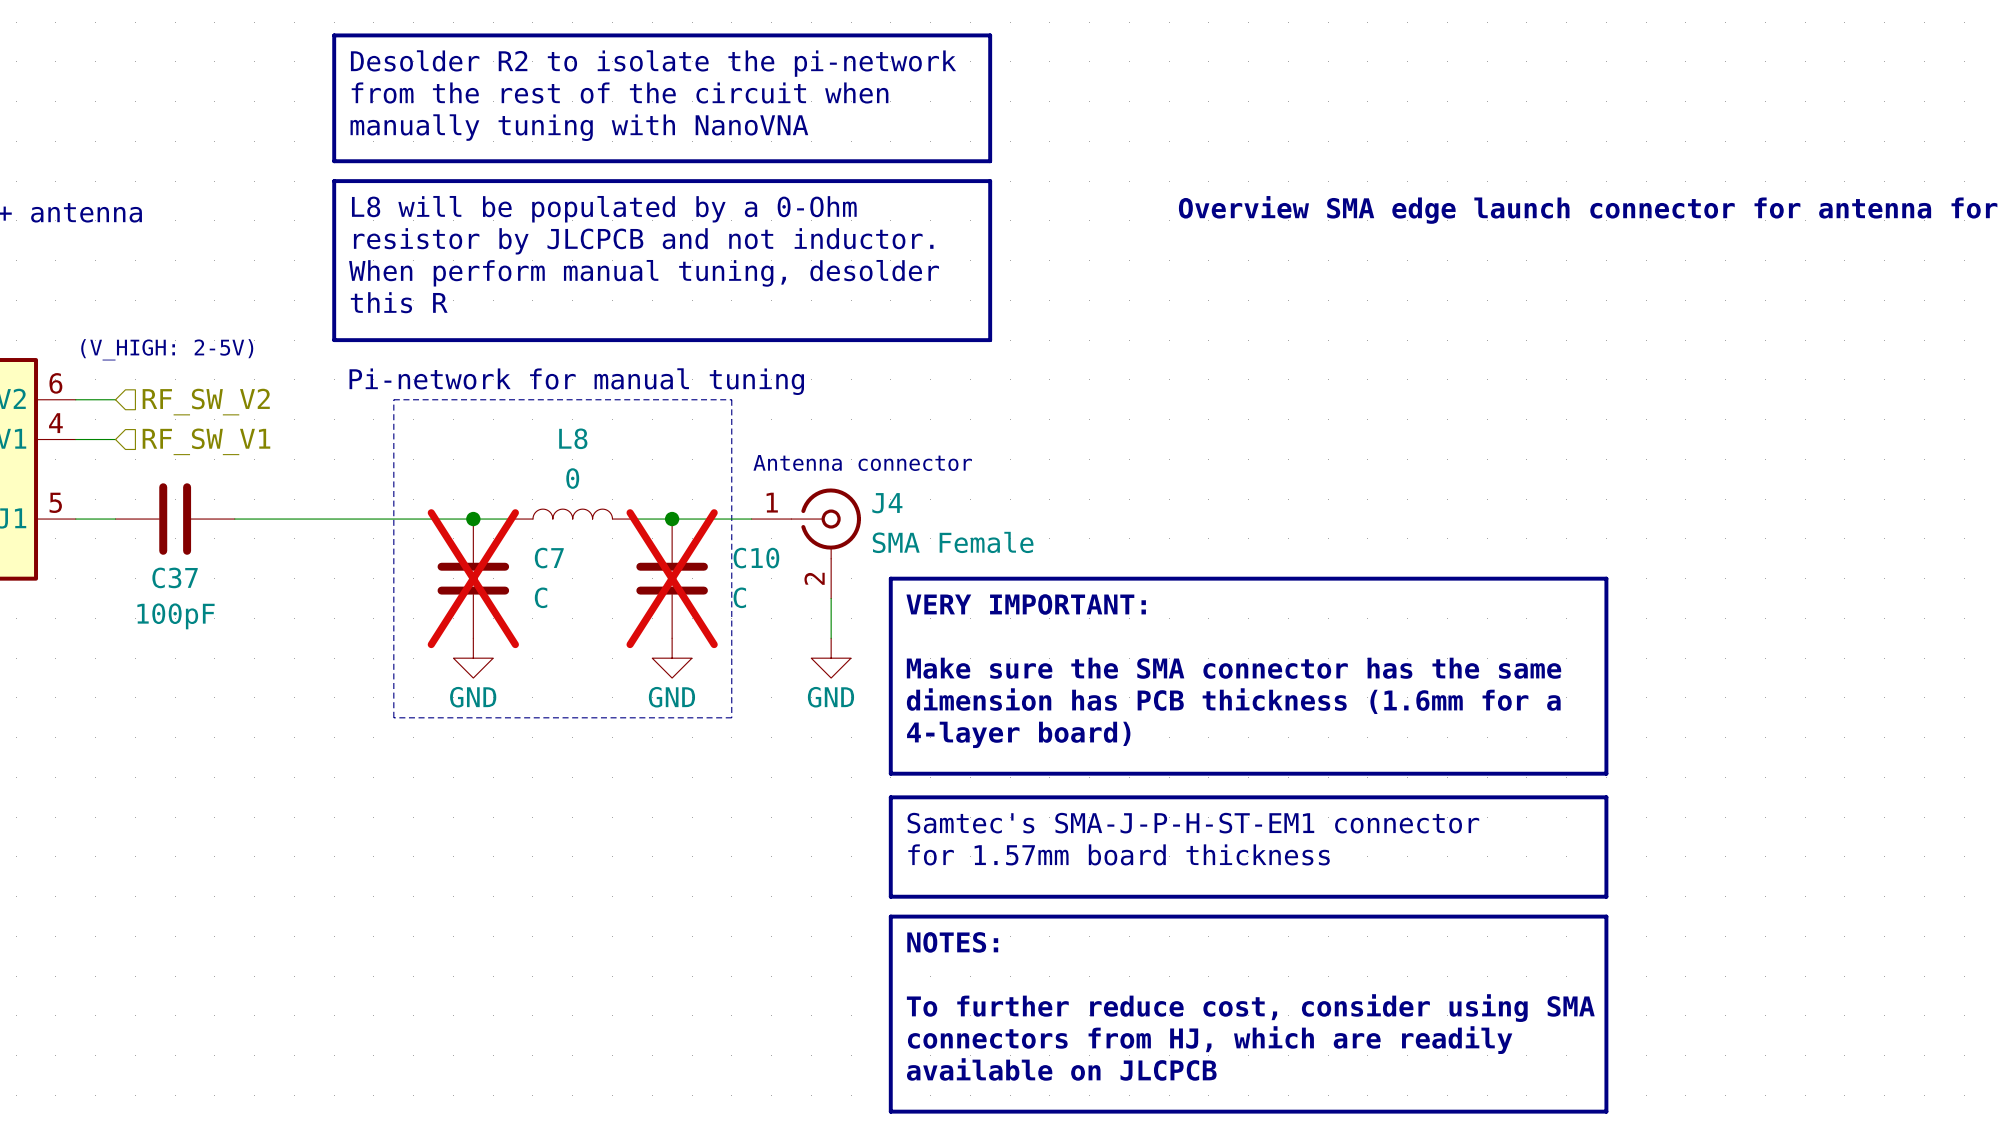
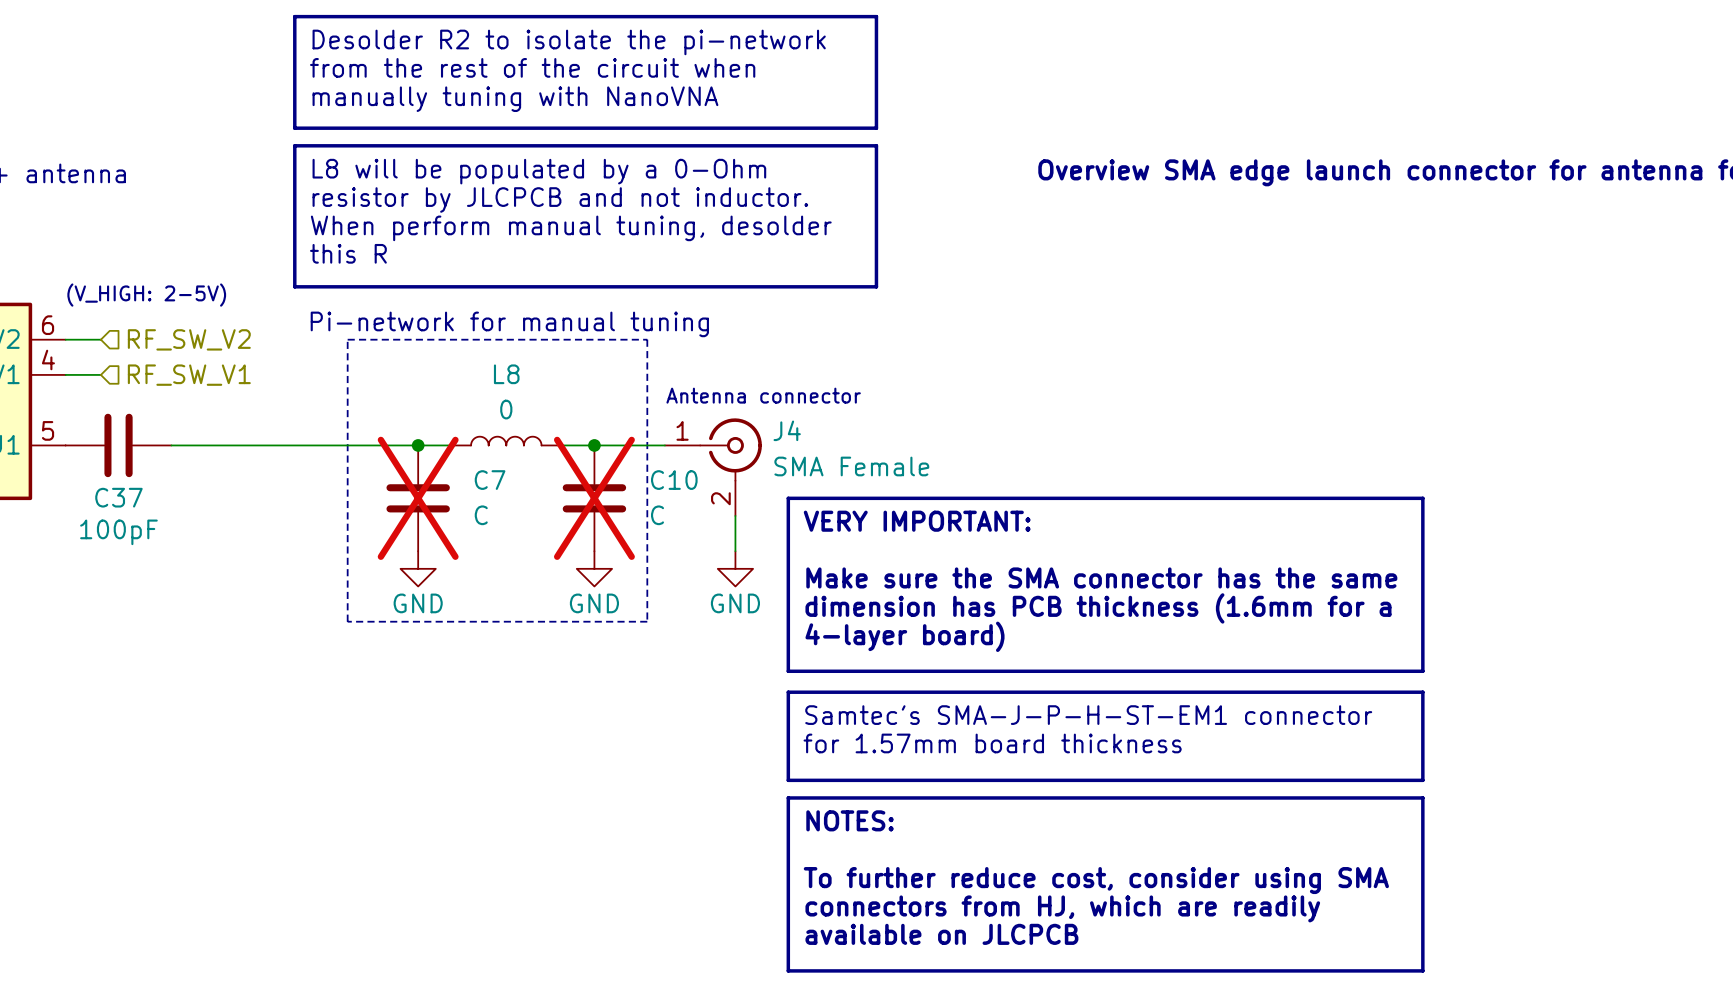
C37 position: (175, 519) -> (118, 445)

